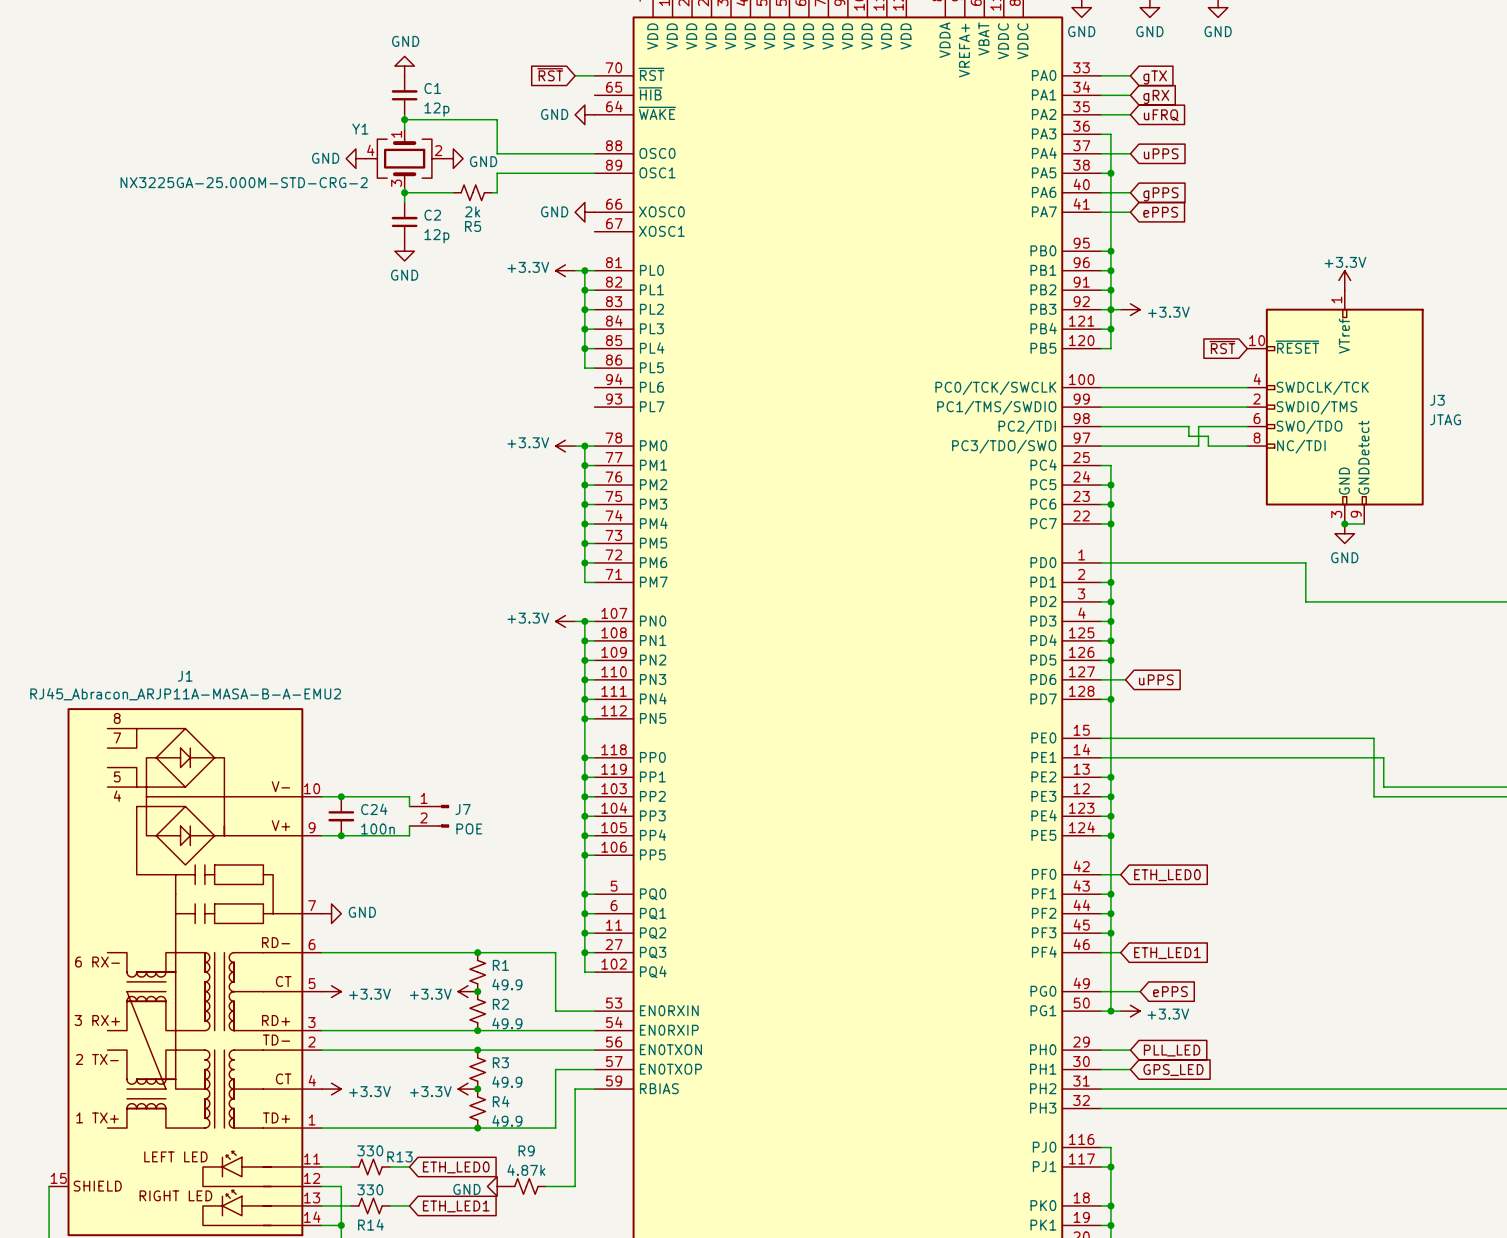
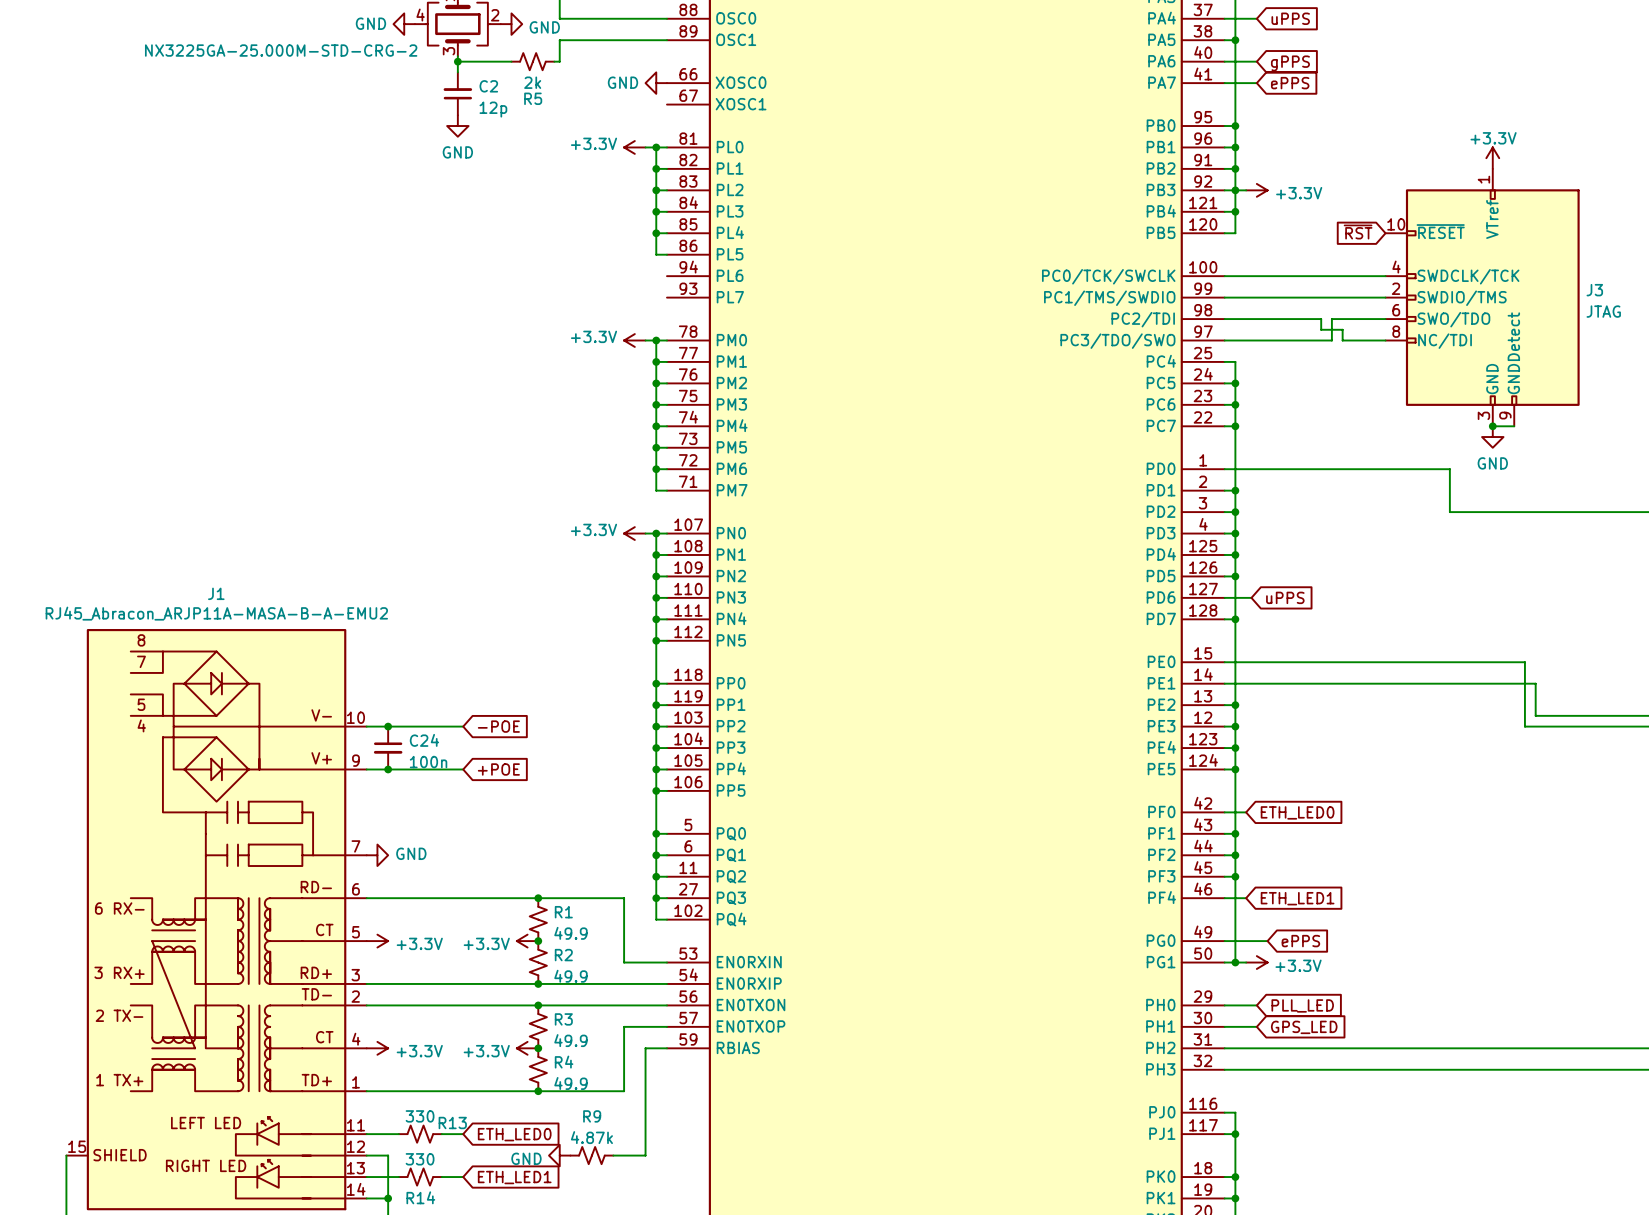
wire: (409, 796) (409, 806) -> none
global label: none -> -POE (498, 726)
J7: POE (429, 816) -> none
wire: (409, 826) (409, 835) -> none
global label: none -> +POE (498, 769)

